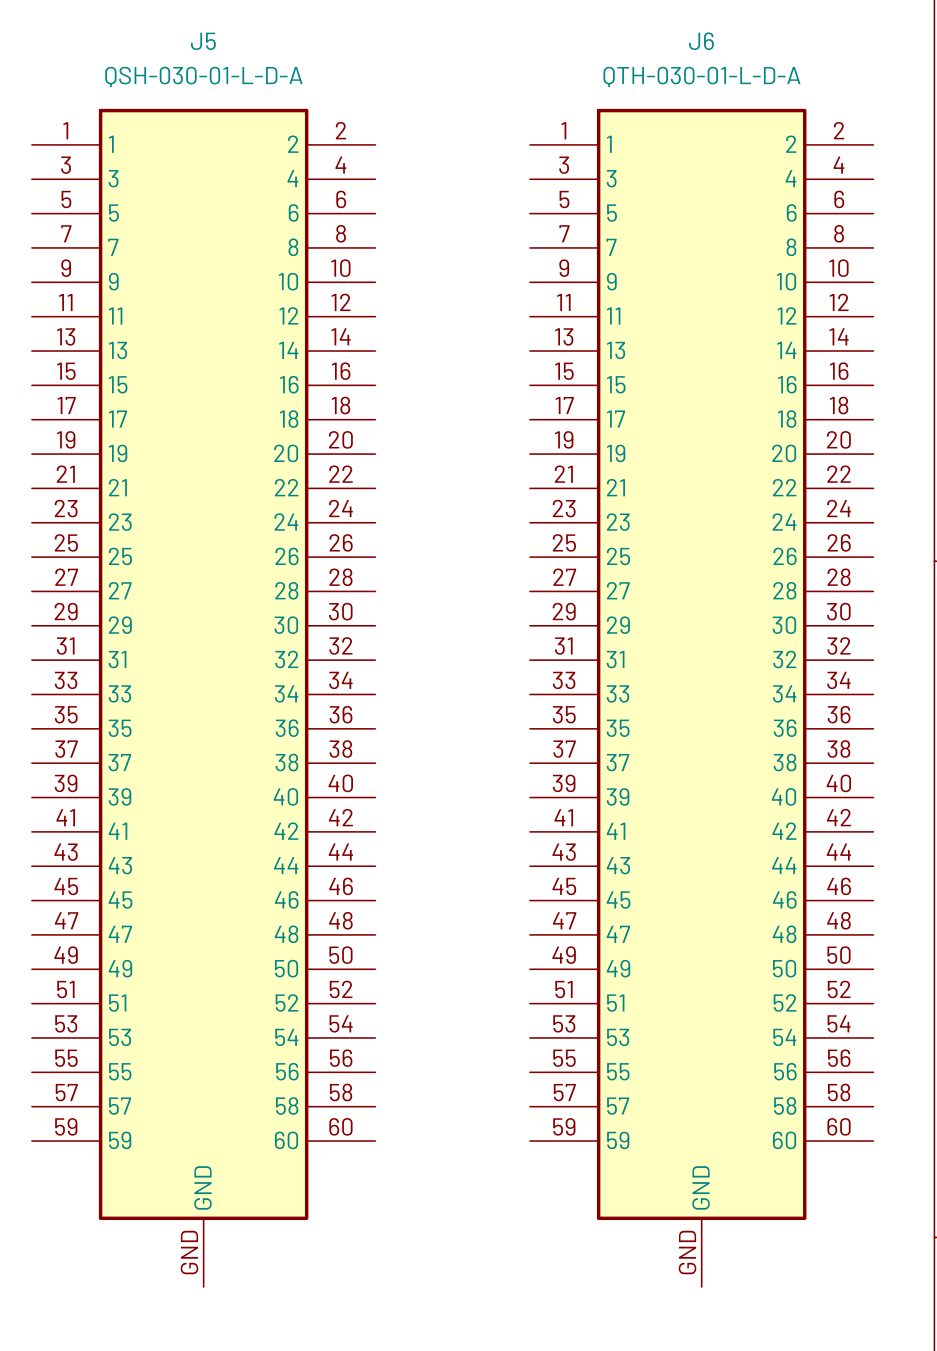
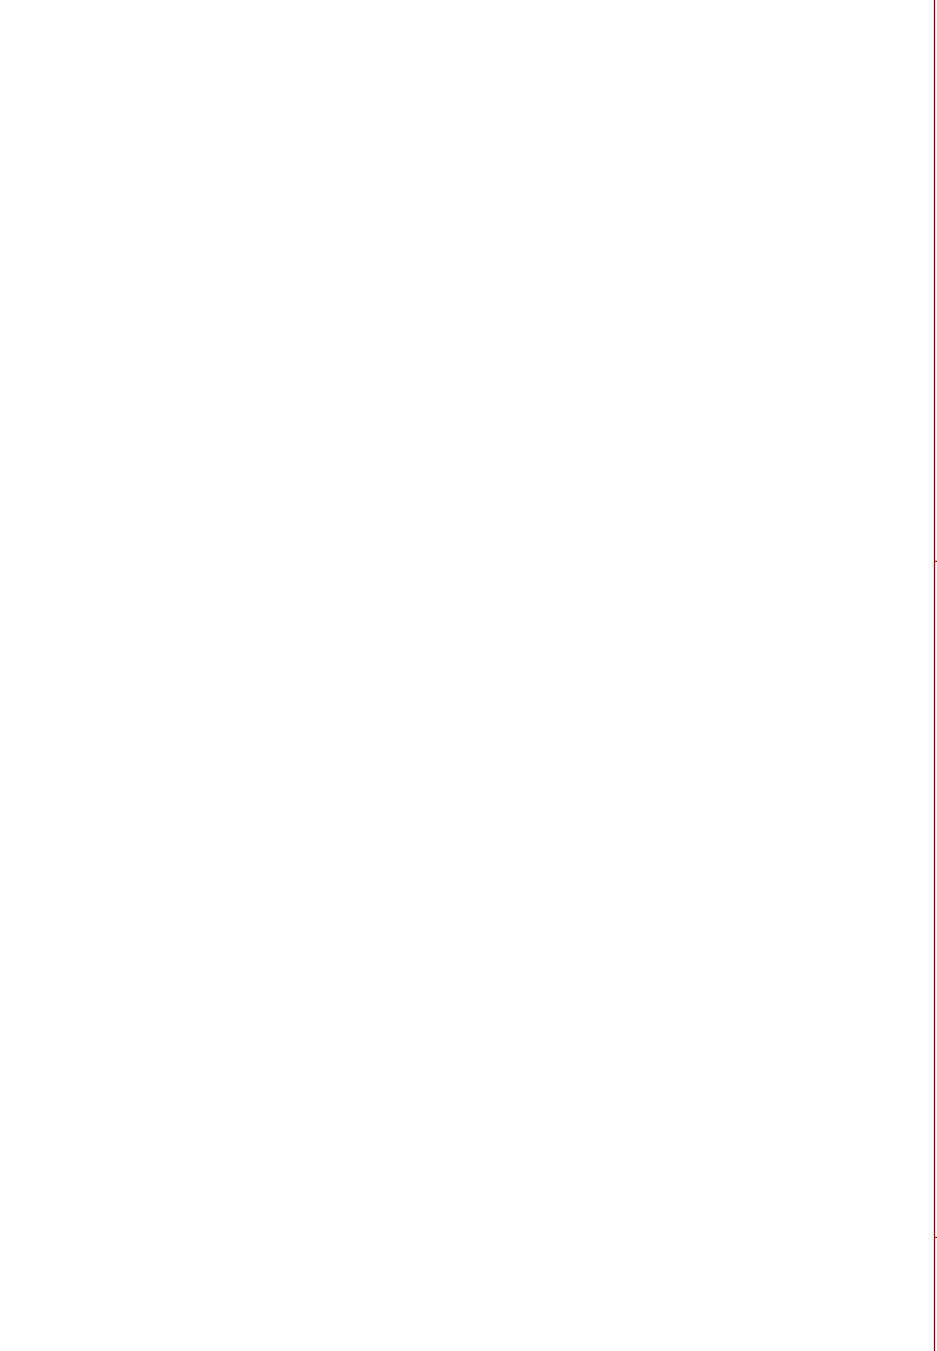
J5: QSH-030-01-L-D-A (203, 697) -> none
J6: QTH-030-01-L-D-A (701, 697) -> none

